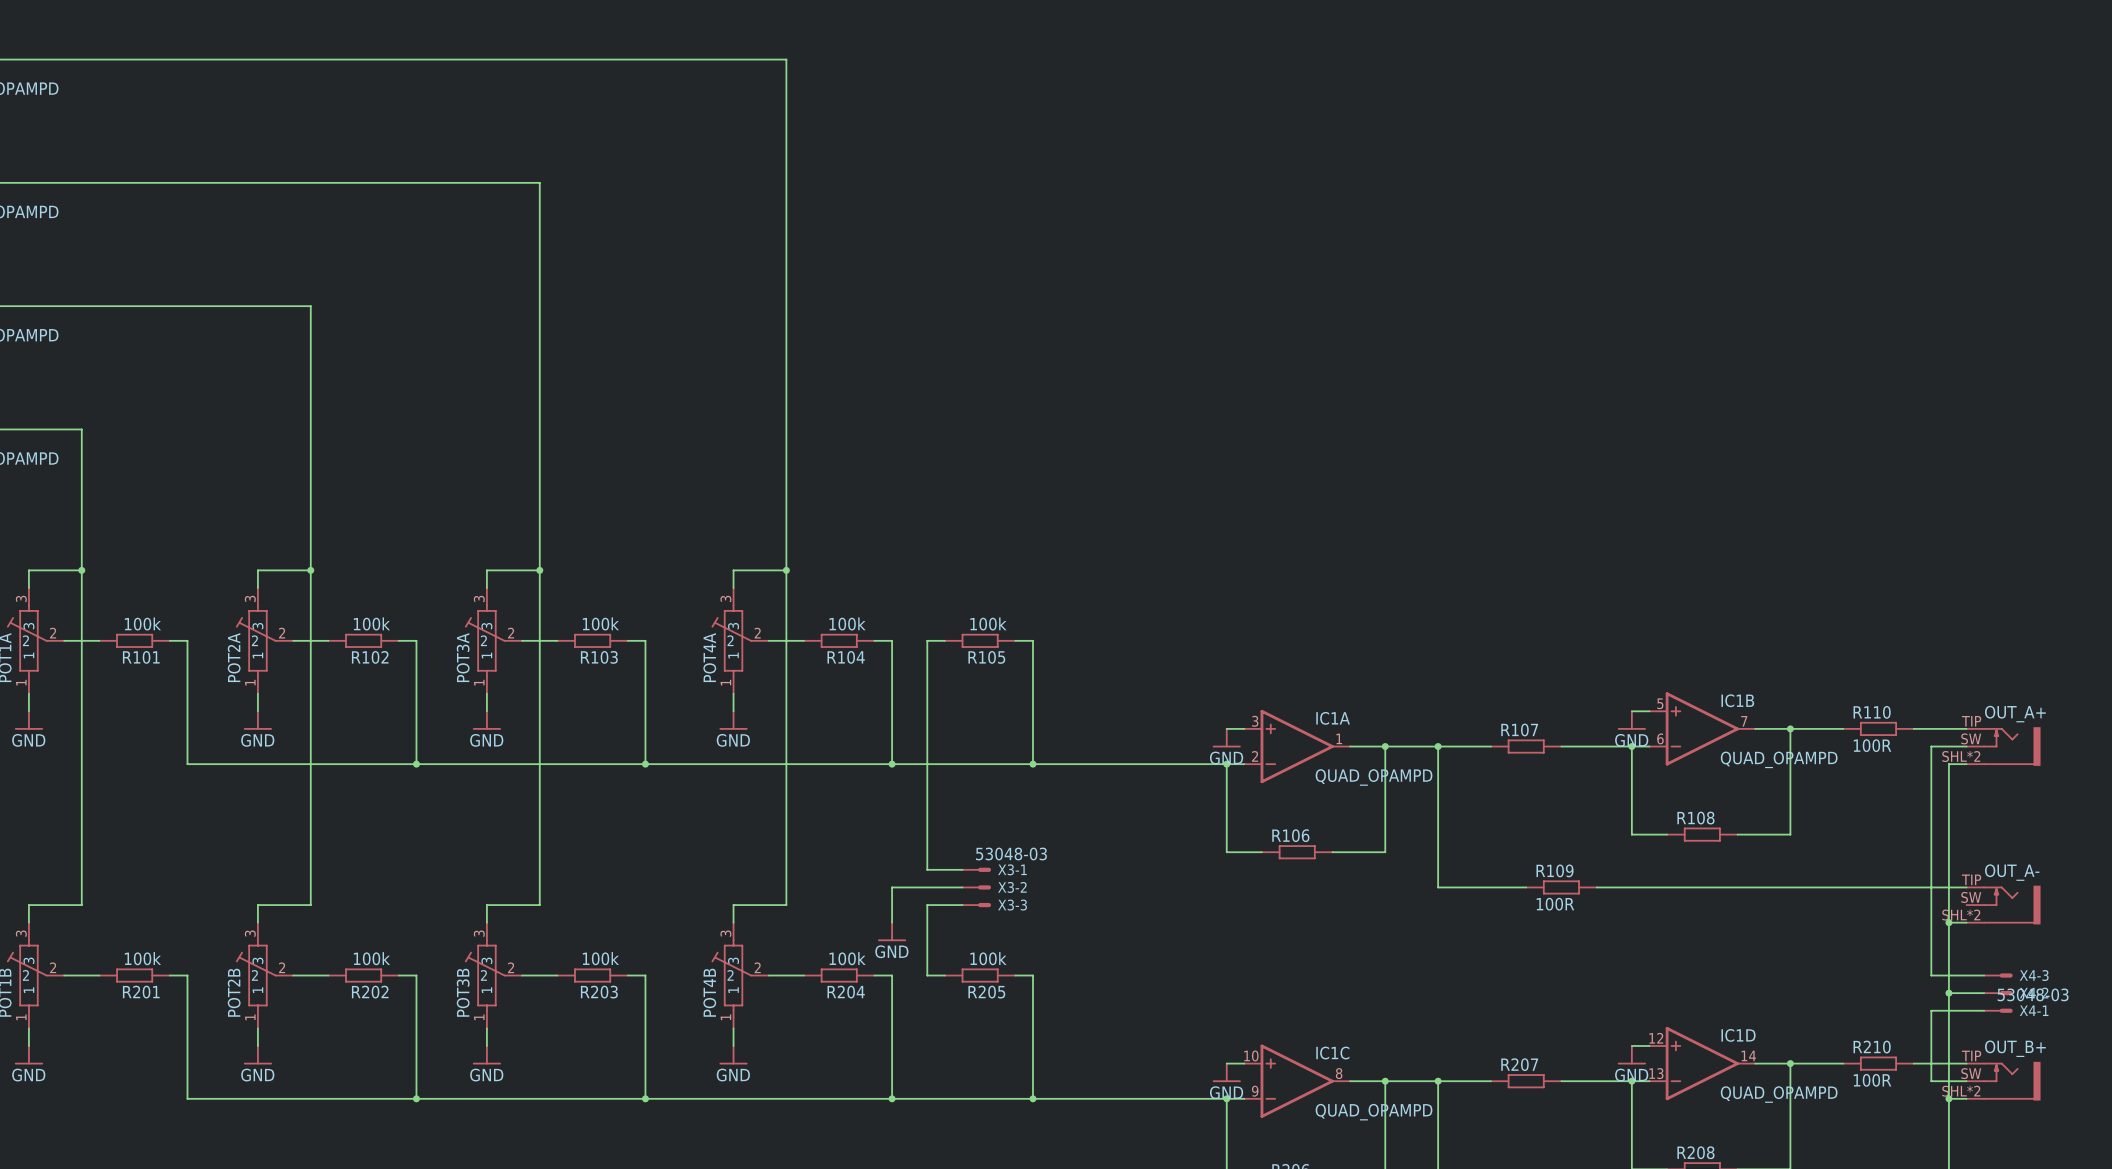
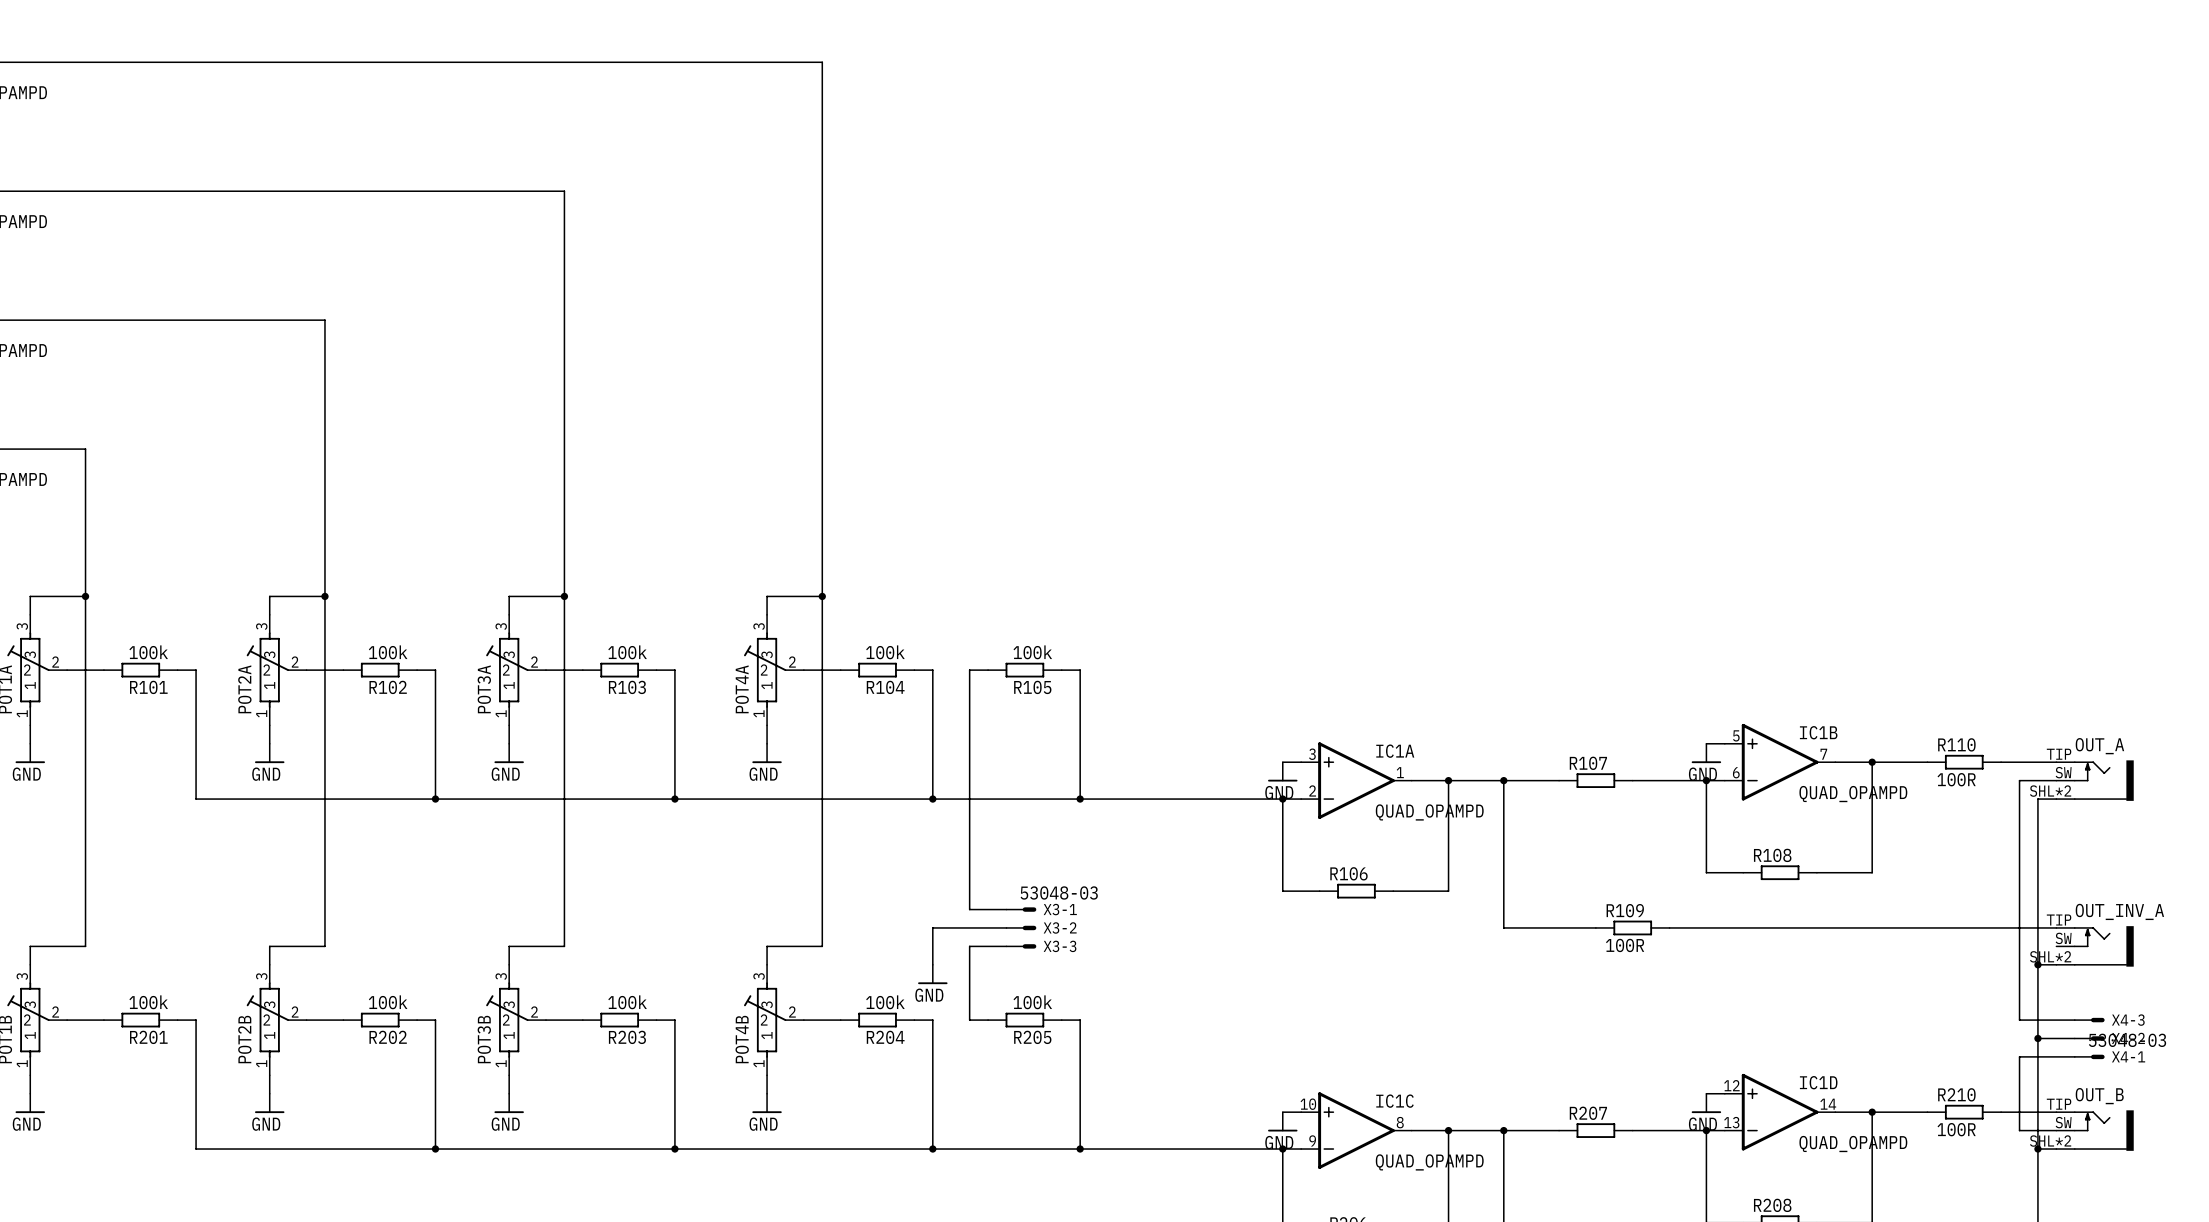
OUT_A+ name: OUT_A+ (2015, 714) -> OUT_A (2099, 746)
OUT_A- name: OUT_A- (2012, 872) -> OUT_INV_A (2119, 911)
OUT_B+ name: OUT_B+ (2015, 1048) -> OUT_B (2099, 1096)

